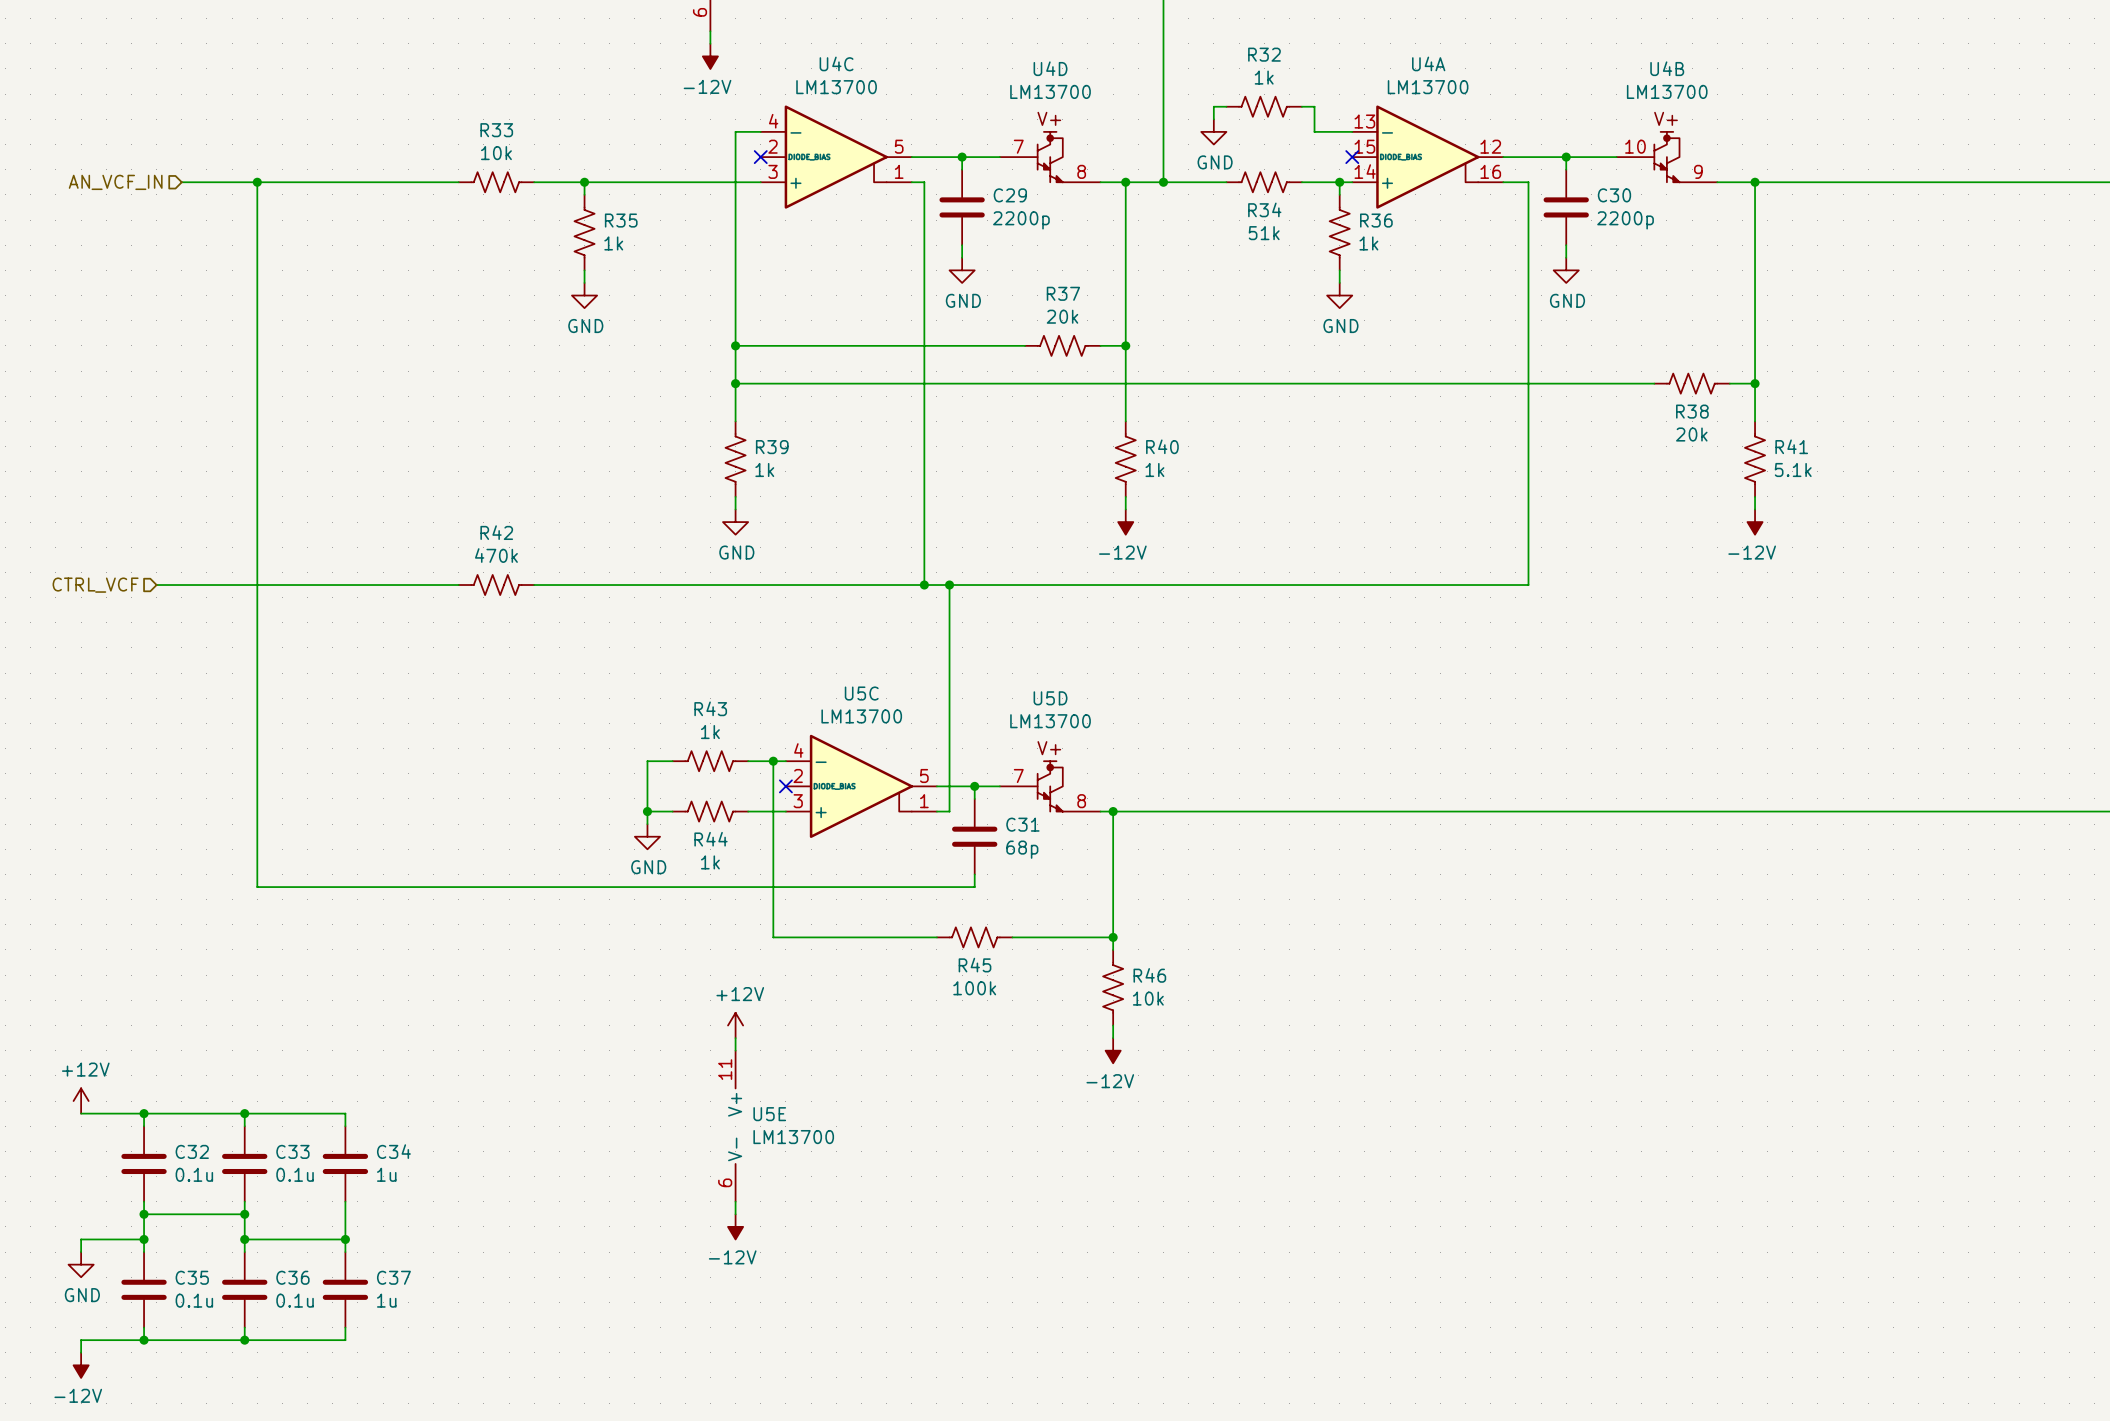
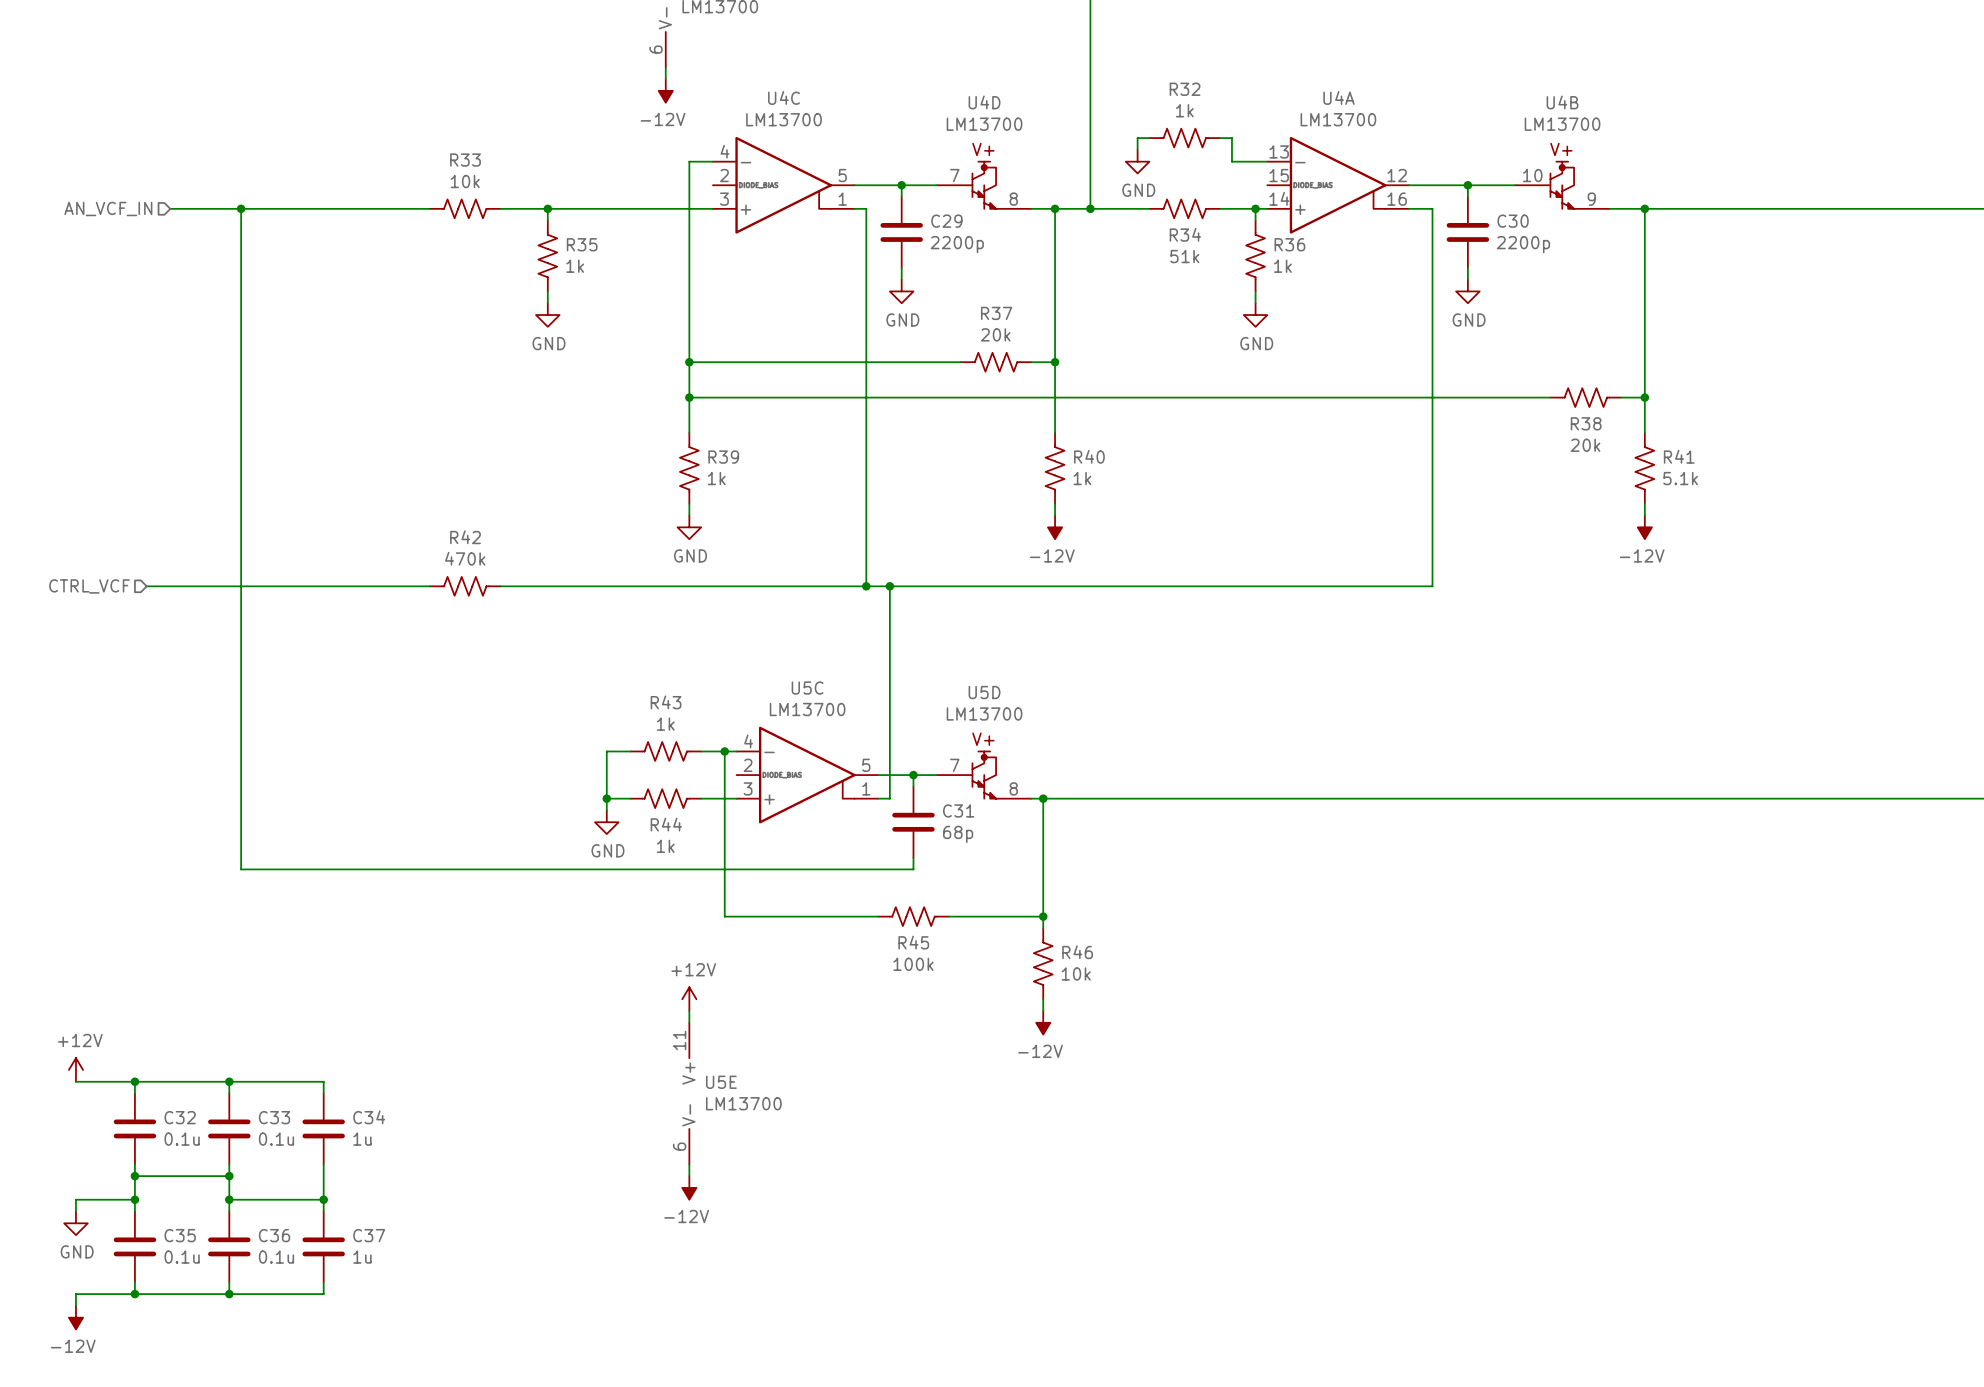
no-connect mark: (760, 157) -> none
no-connect mark: (1352, 157) -> none
no-connect mark: (785, 786) -> none

